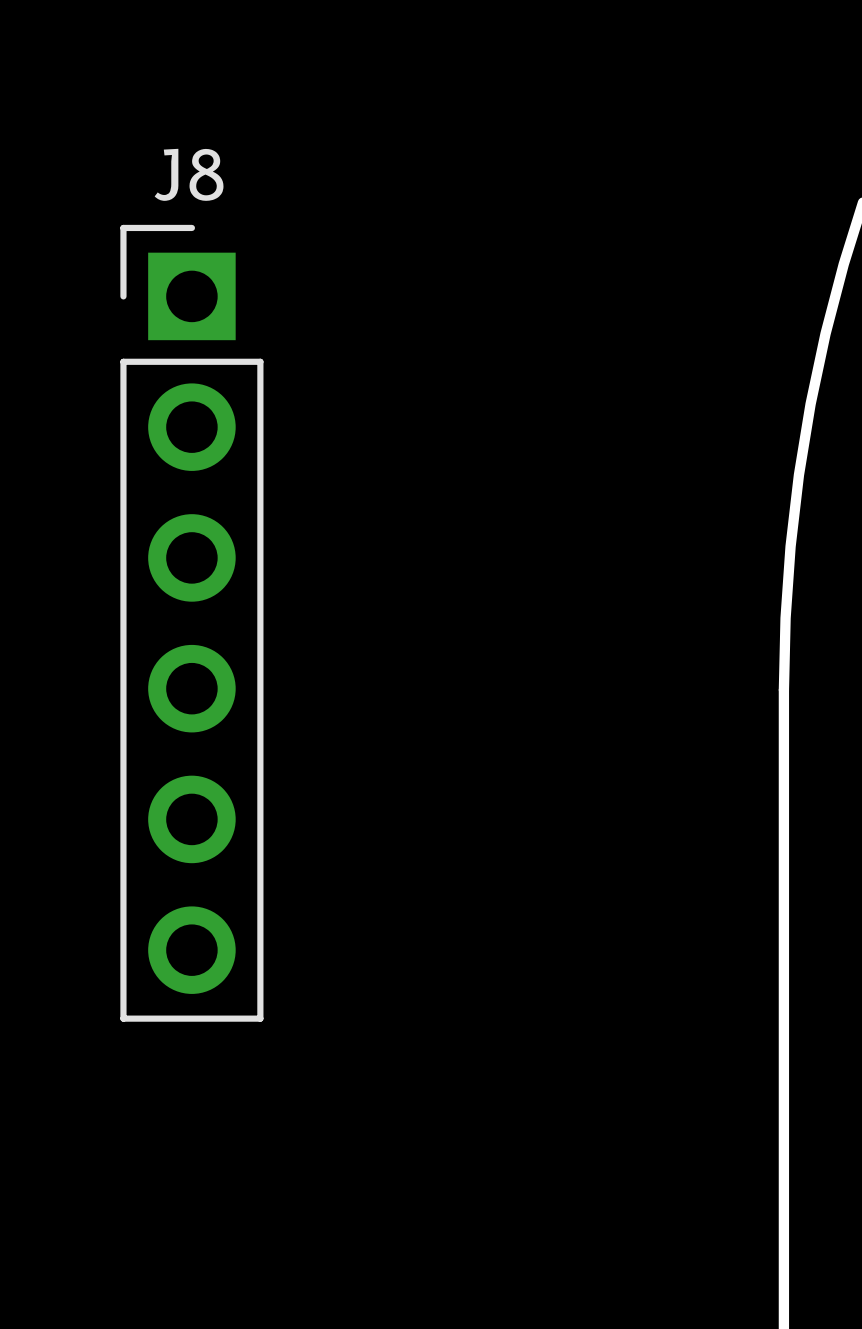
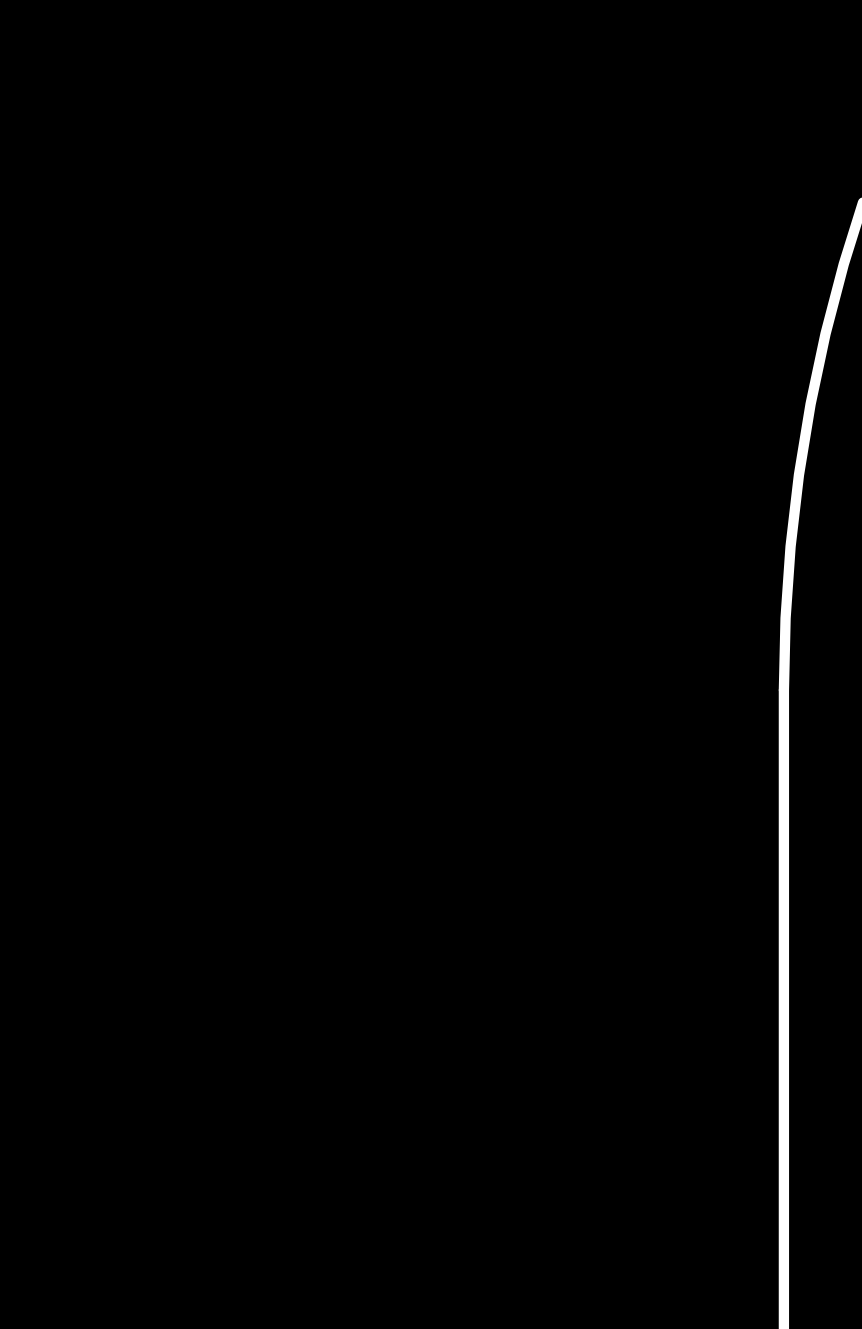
J8: (191, 623) -> none

